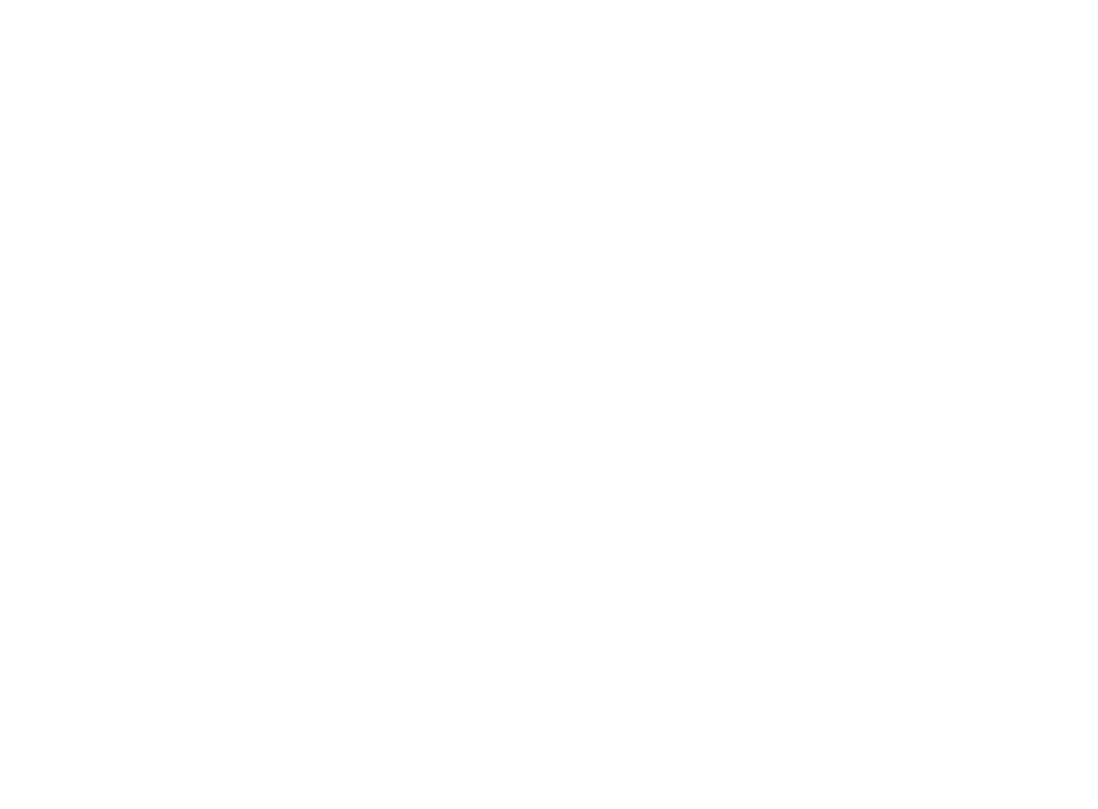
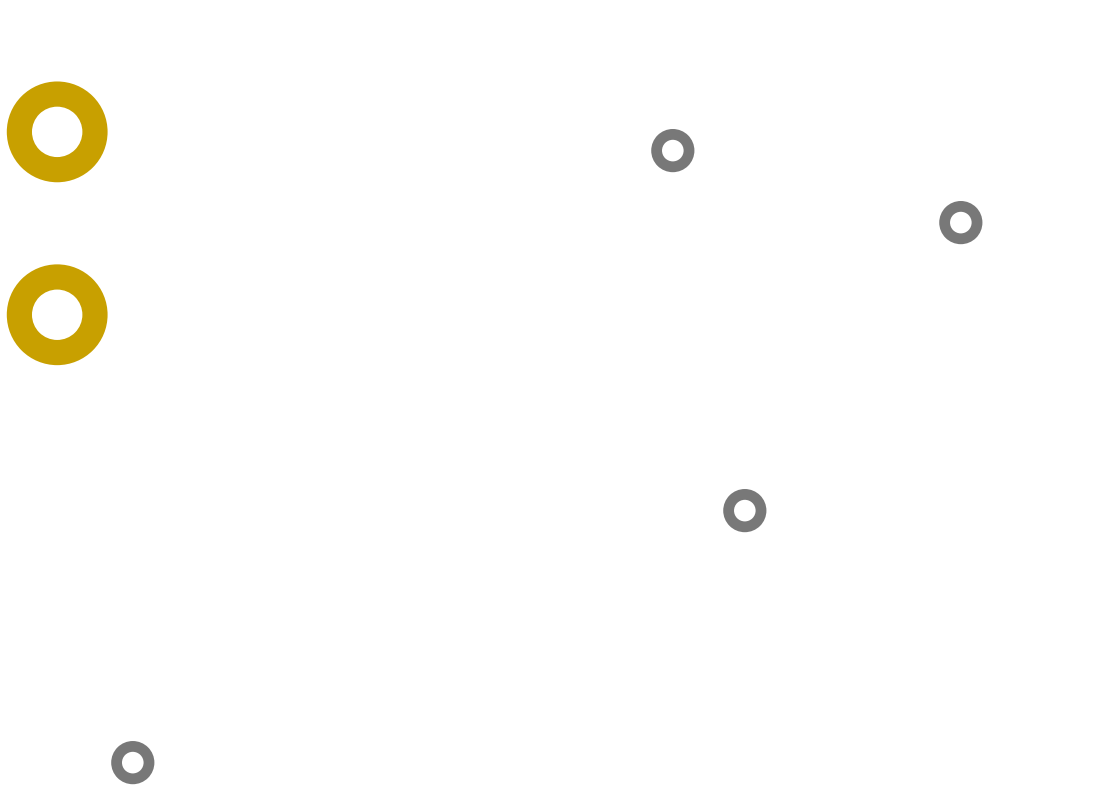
via: none -> (672, 150)
via: none -> (960, 222)
part: none -> (57, 223)
via: none -> (744, 510)
via: none -> (132, 762)

